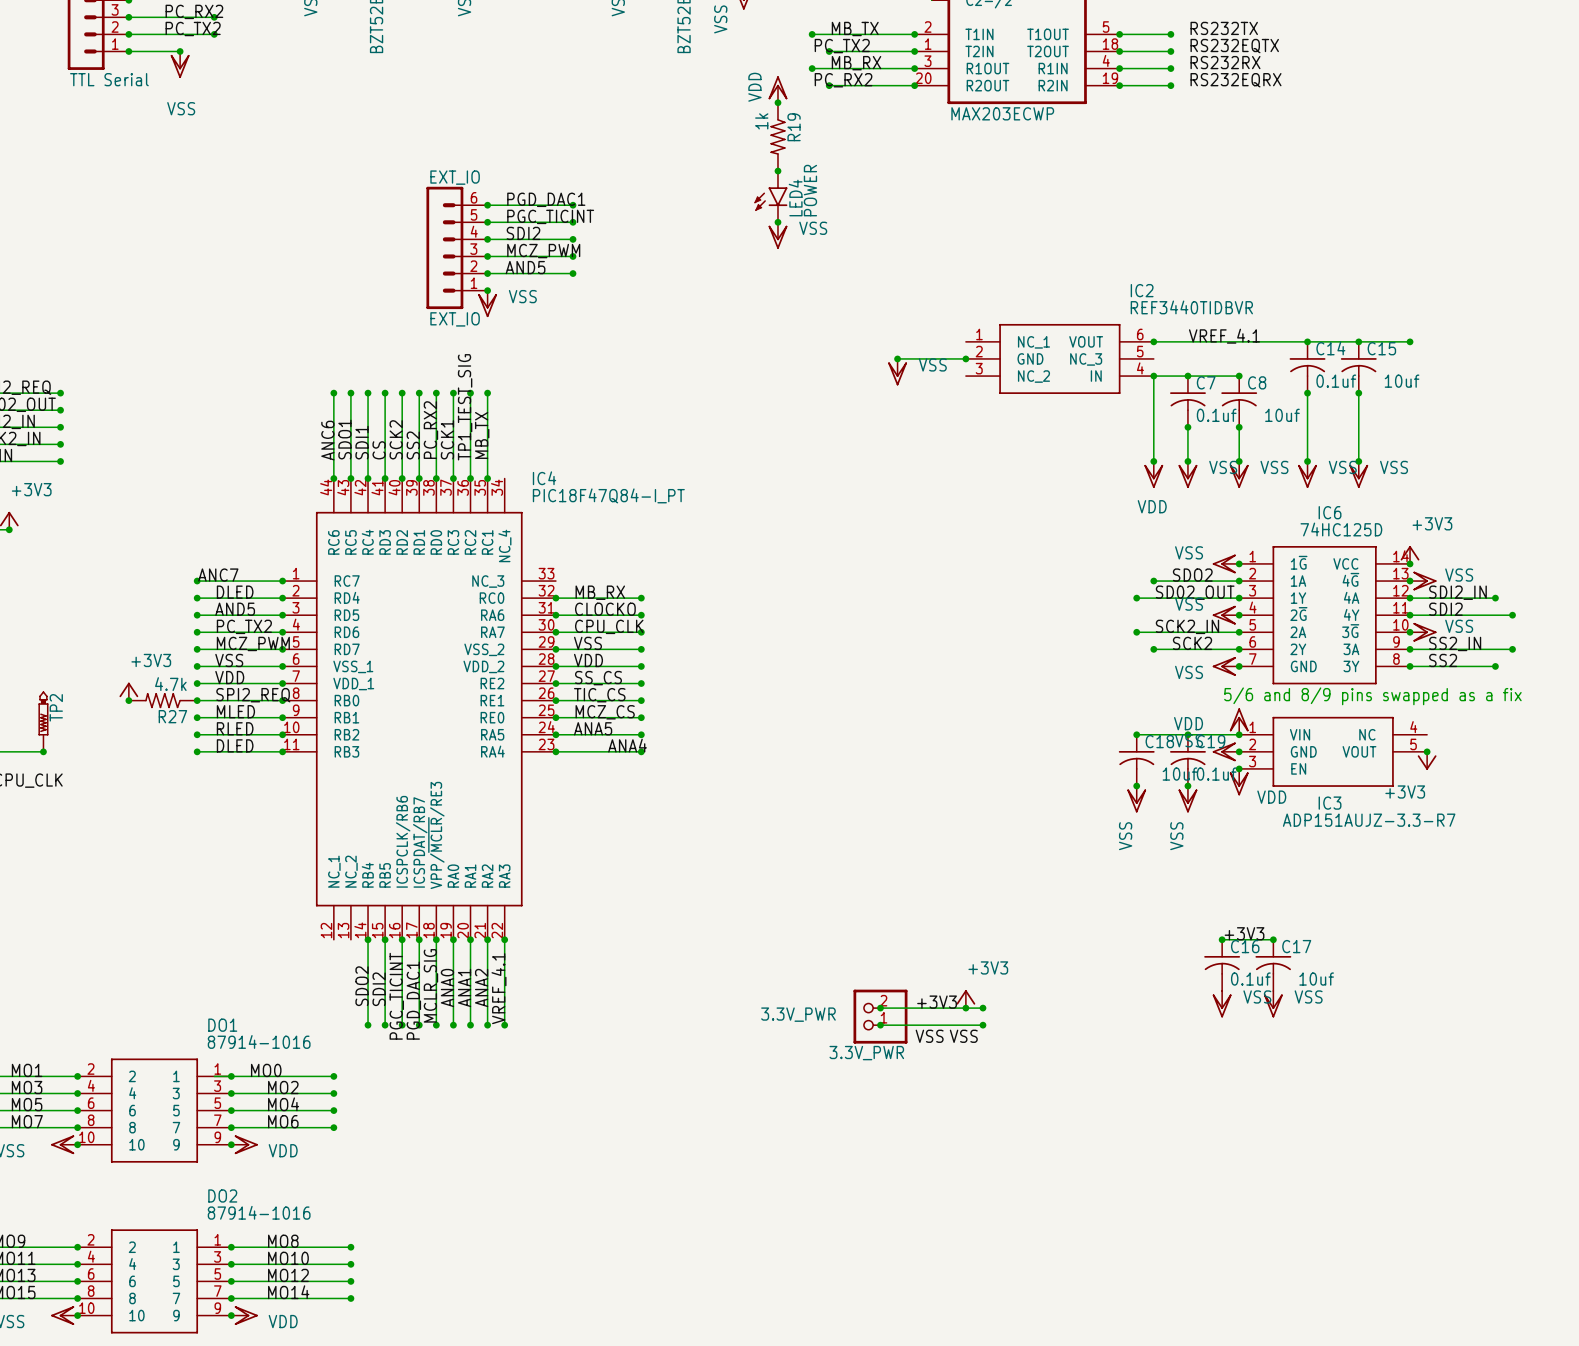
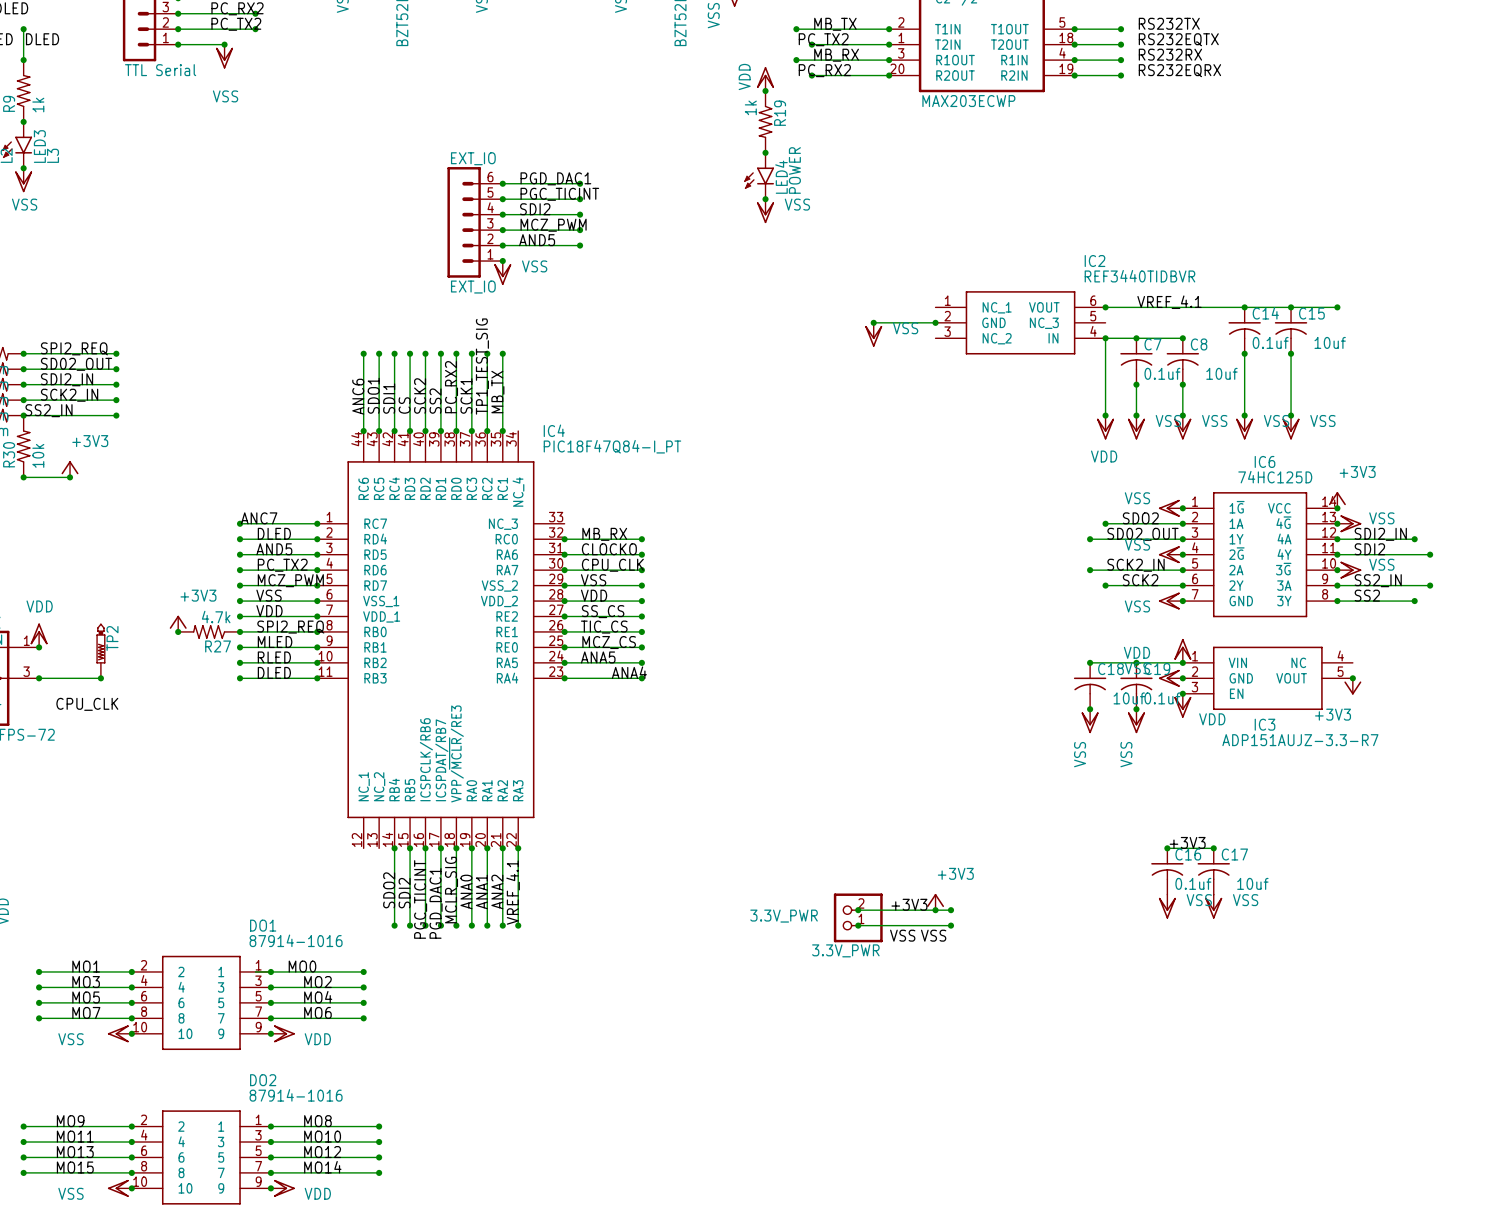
text: 5/6 and 8/9 pins swapped as a fix (1372, 696) -> none

